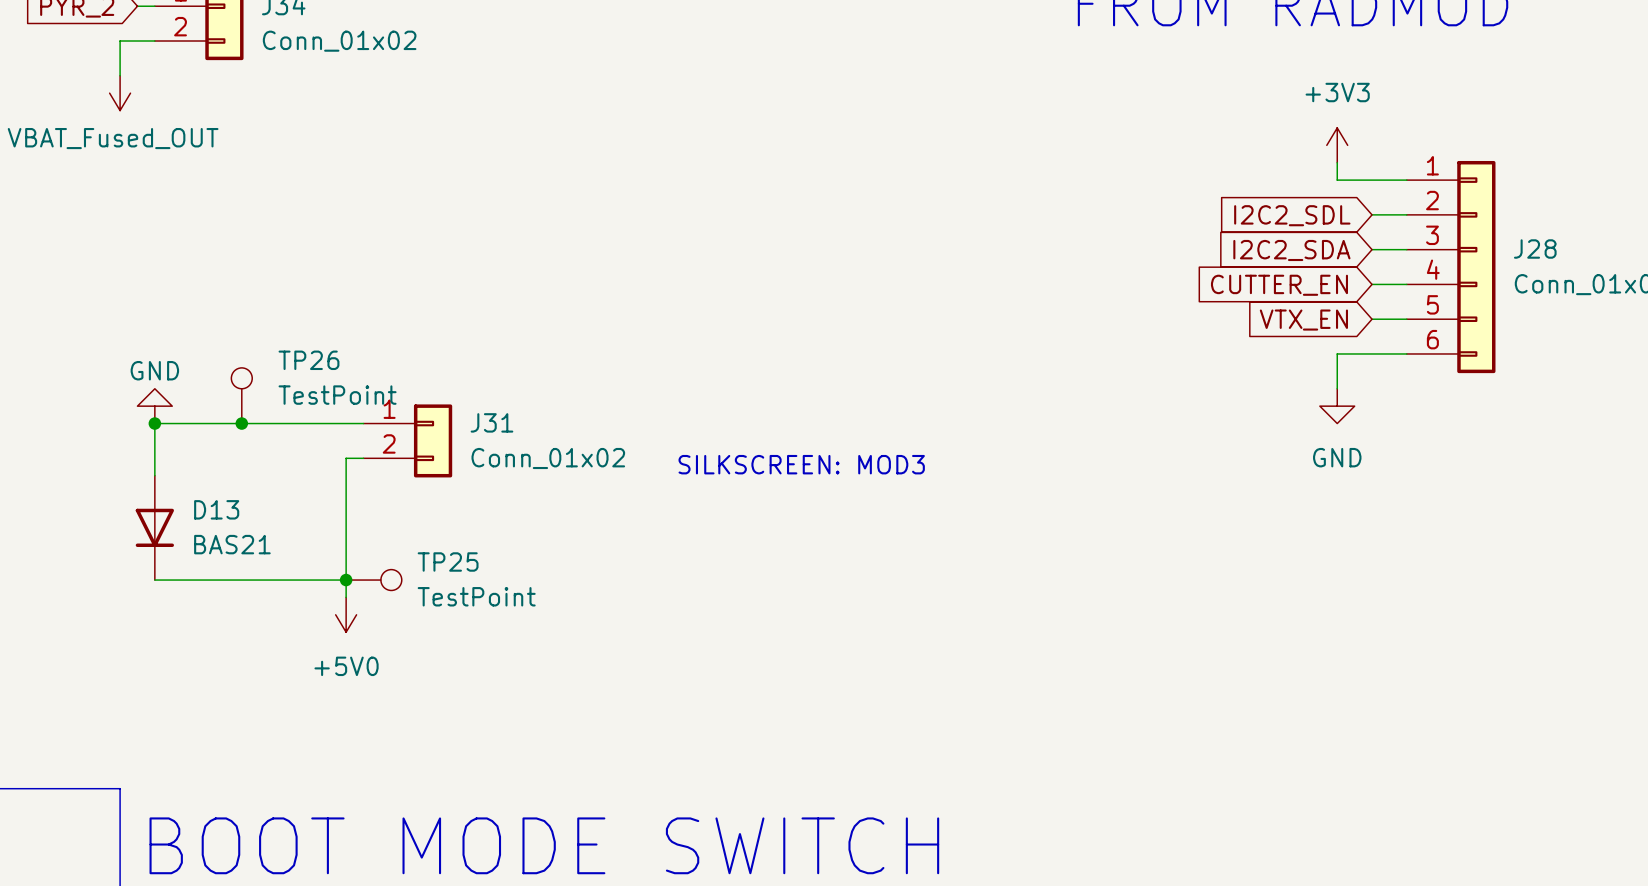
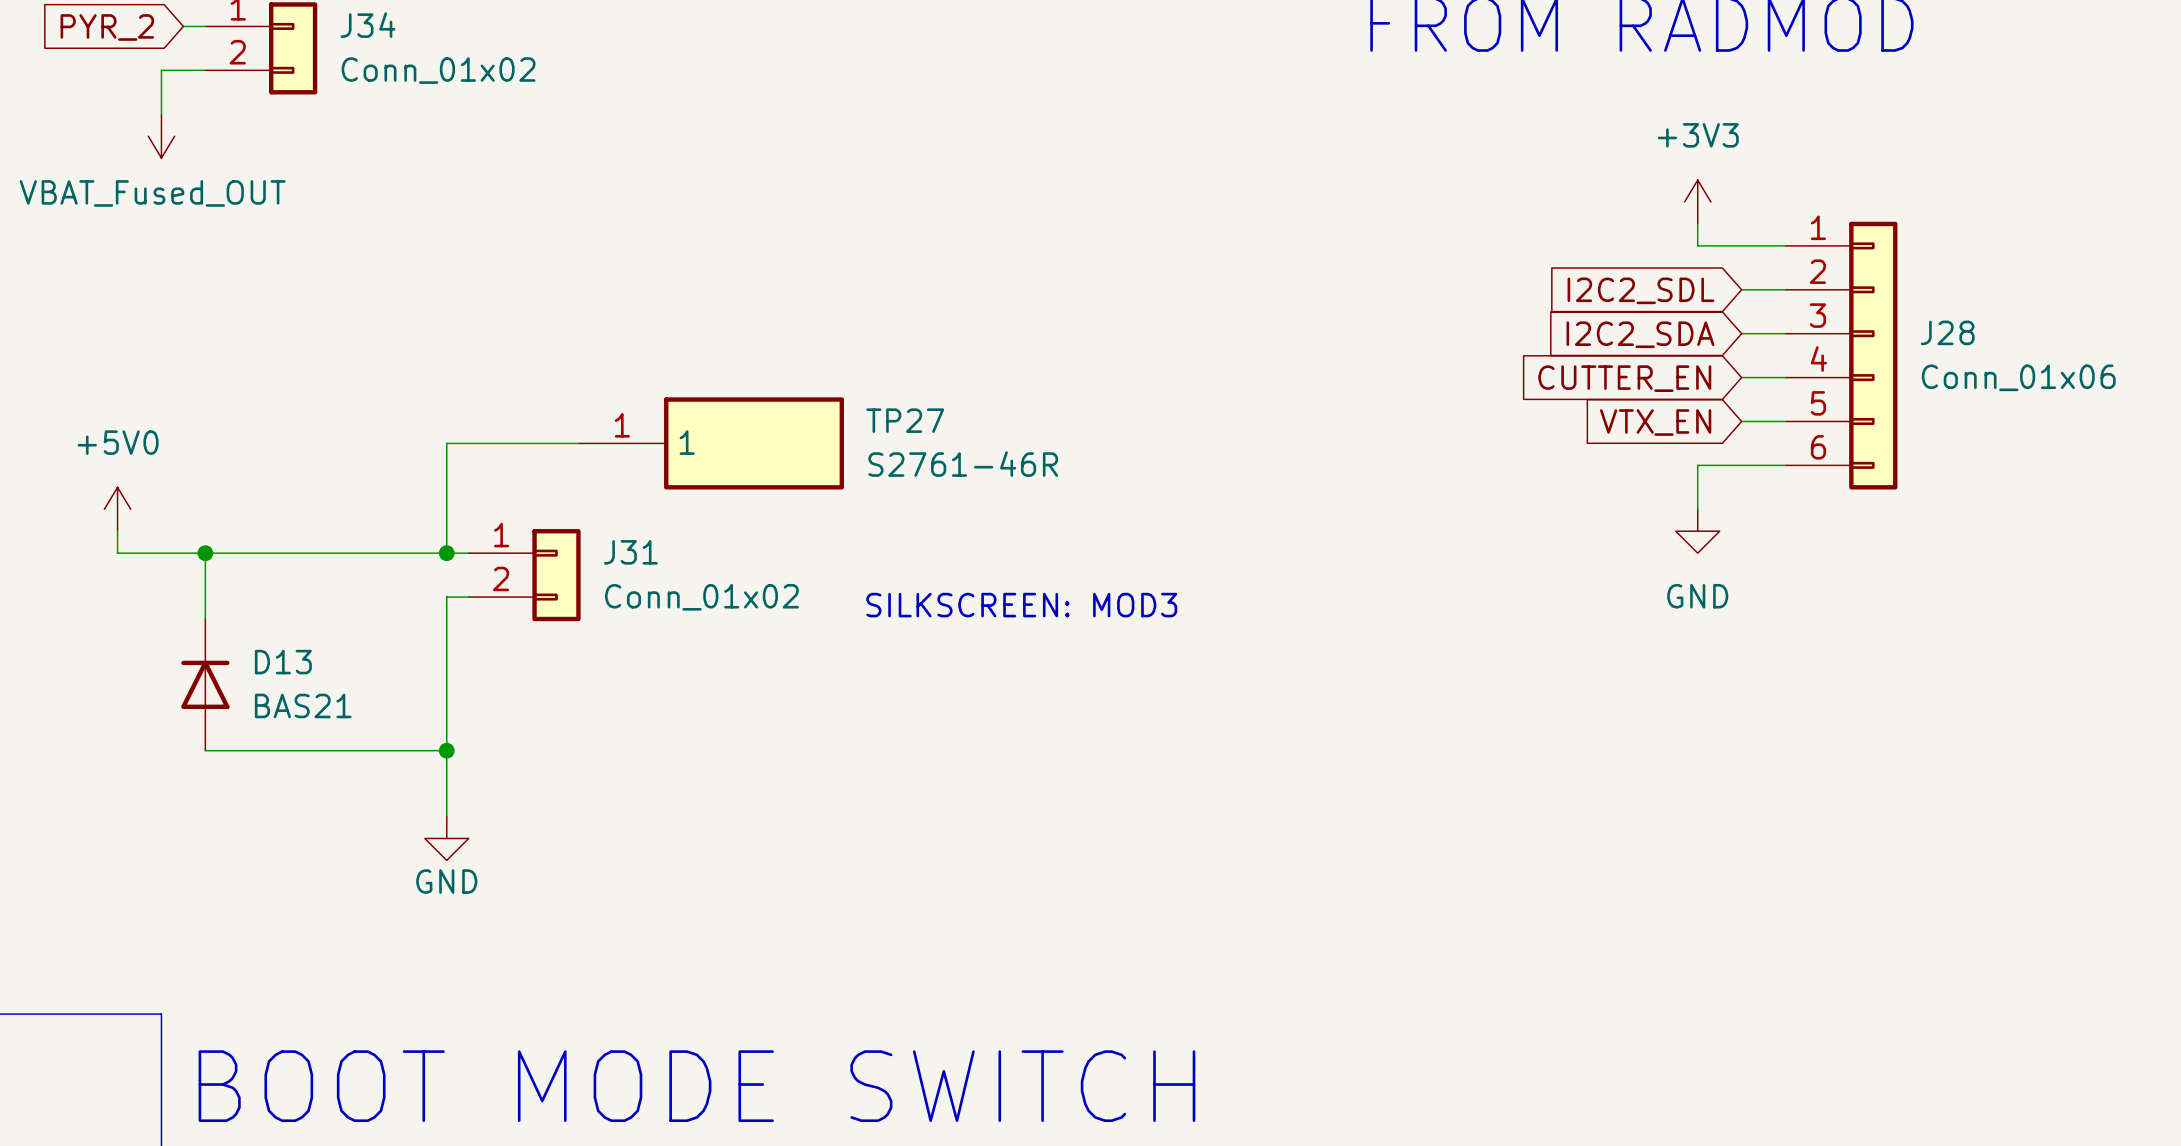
wire: none -> (578, 443) (446, 443) (446, 553)
TP27: none -> S2761-46R (711, 443)
power symbol: none -> +5V0 (117, 509)
TP26: TestPoint (241, 395) -> none
wire: none -> (117, 531) (117, 553) (205, 553)
power symbol rotation: 0° (154, 406) -> 180° (446, 838)
power symbol position: GND (154, 406) -> GND (446, 838)
junction: (241, 423) -> none
junction: none -> (446, 553)
D13 rotation: 0° (154, 527) -> 180° (205, 684)
TP25: TestPoint (373, 580) -> none
power symbol: +5V0 (346, 614) -> none

